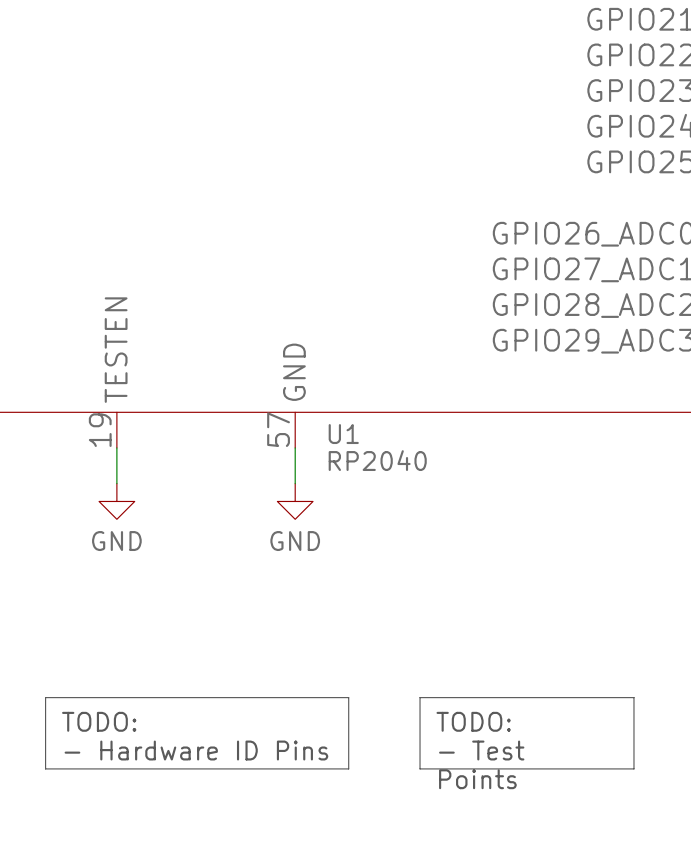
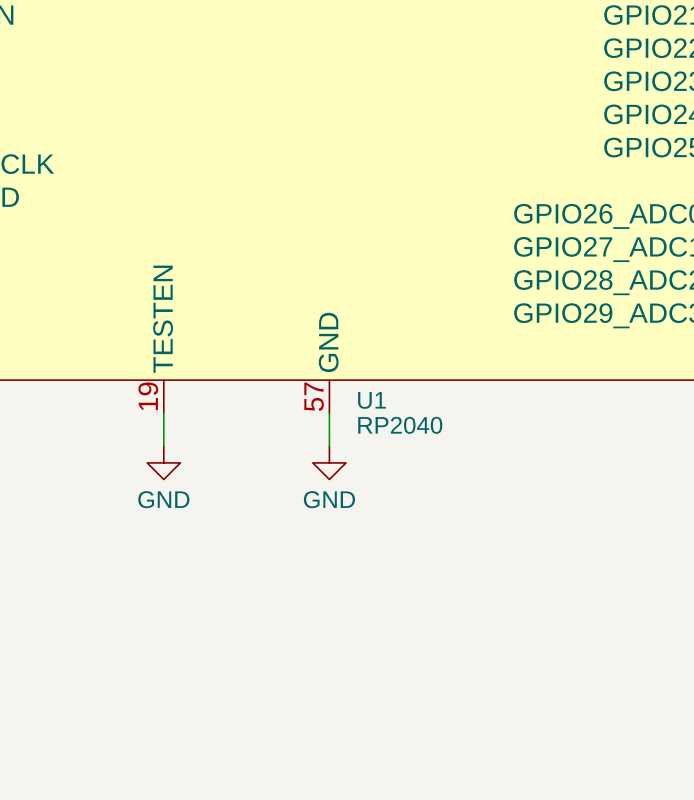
line: (45, 697) (348, 697) (348, 768) (45, 768) (45, 697) -> none
line: (420, 697) (633, 697) (633, 768) (420, 768) (420, 697) -> none
text: TODO: (99, 721) -> none
text: TODO: (473, 721) -> none
text: - Hardware ID Pins (196, 750) -> none
text: - Test (481, 750) -> none
text: Points (477, 779) -> none

